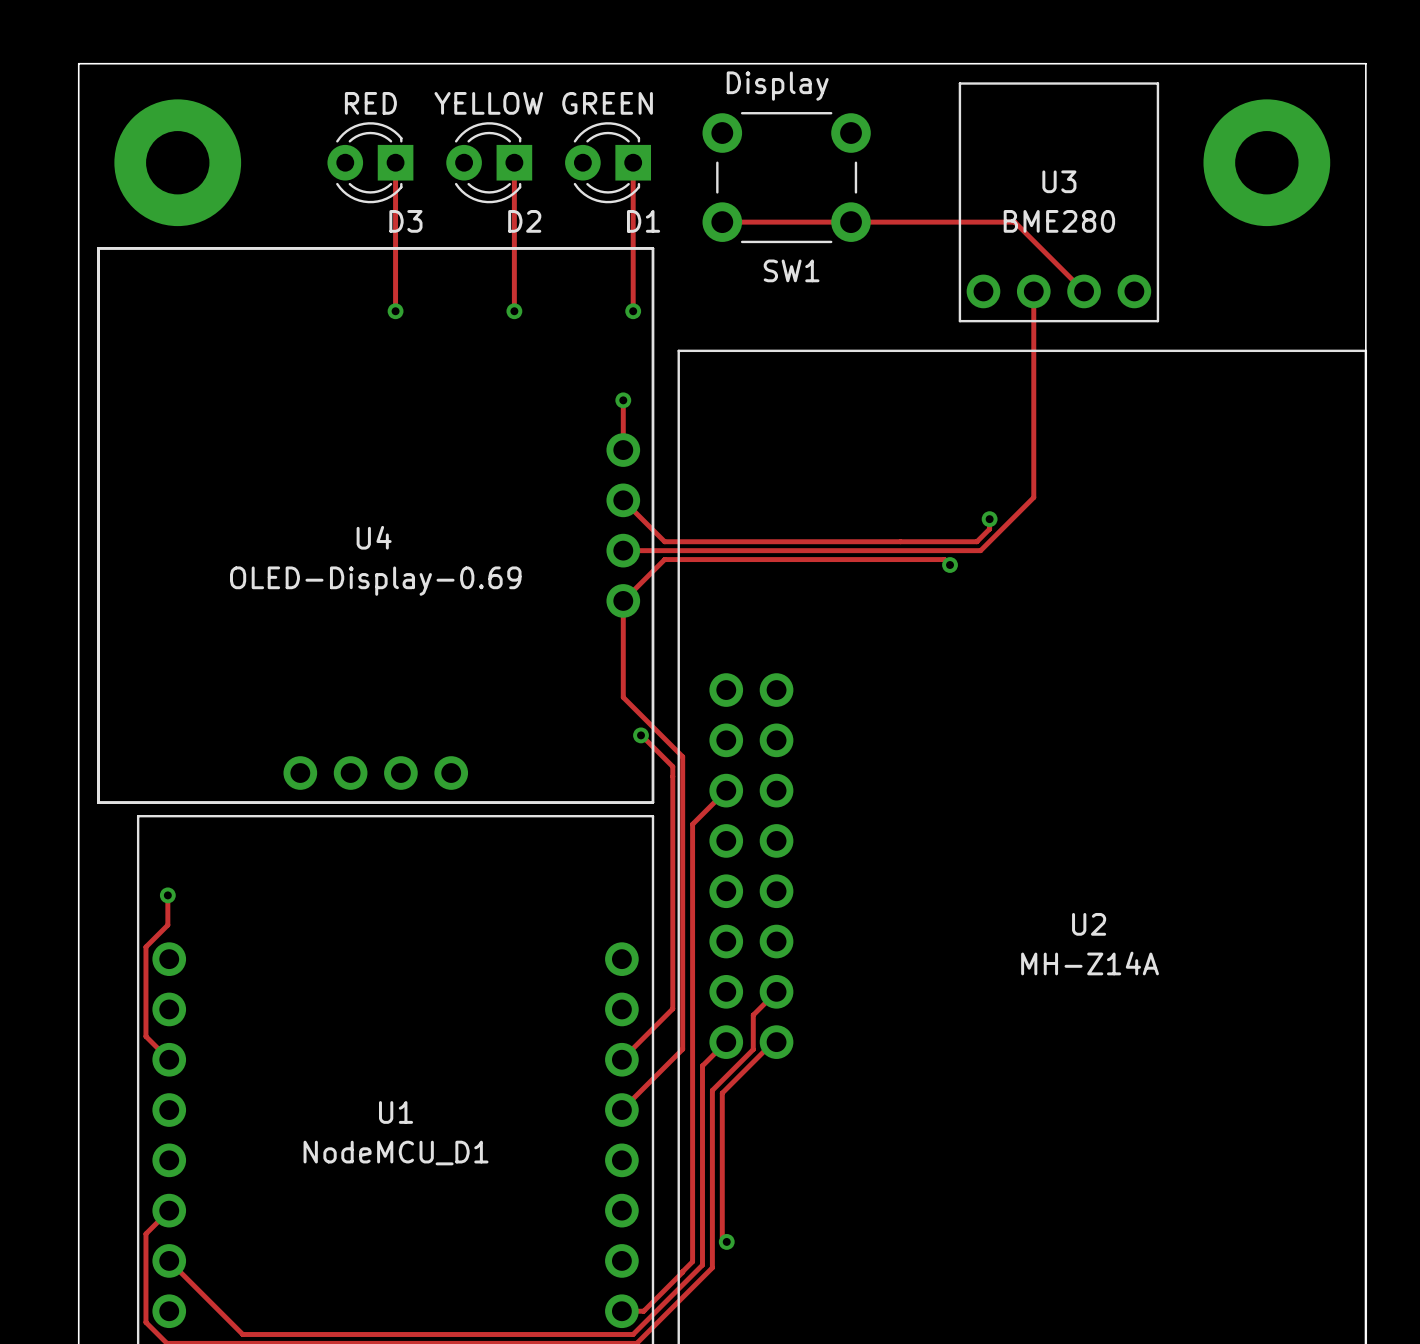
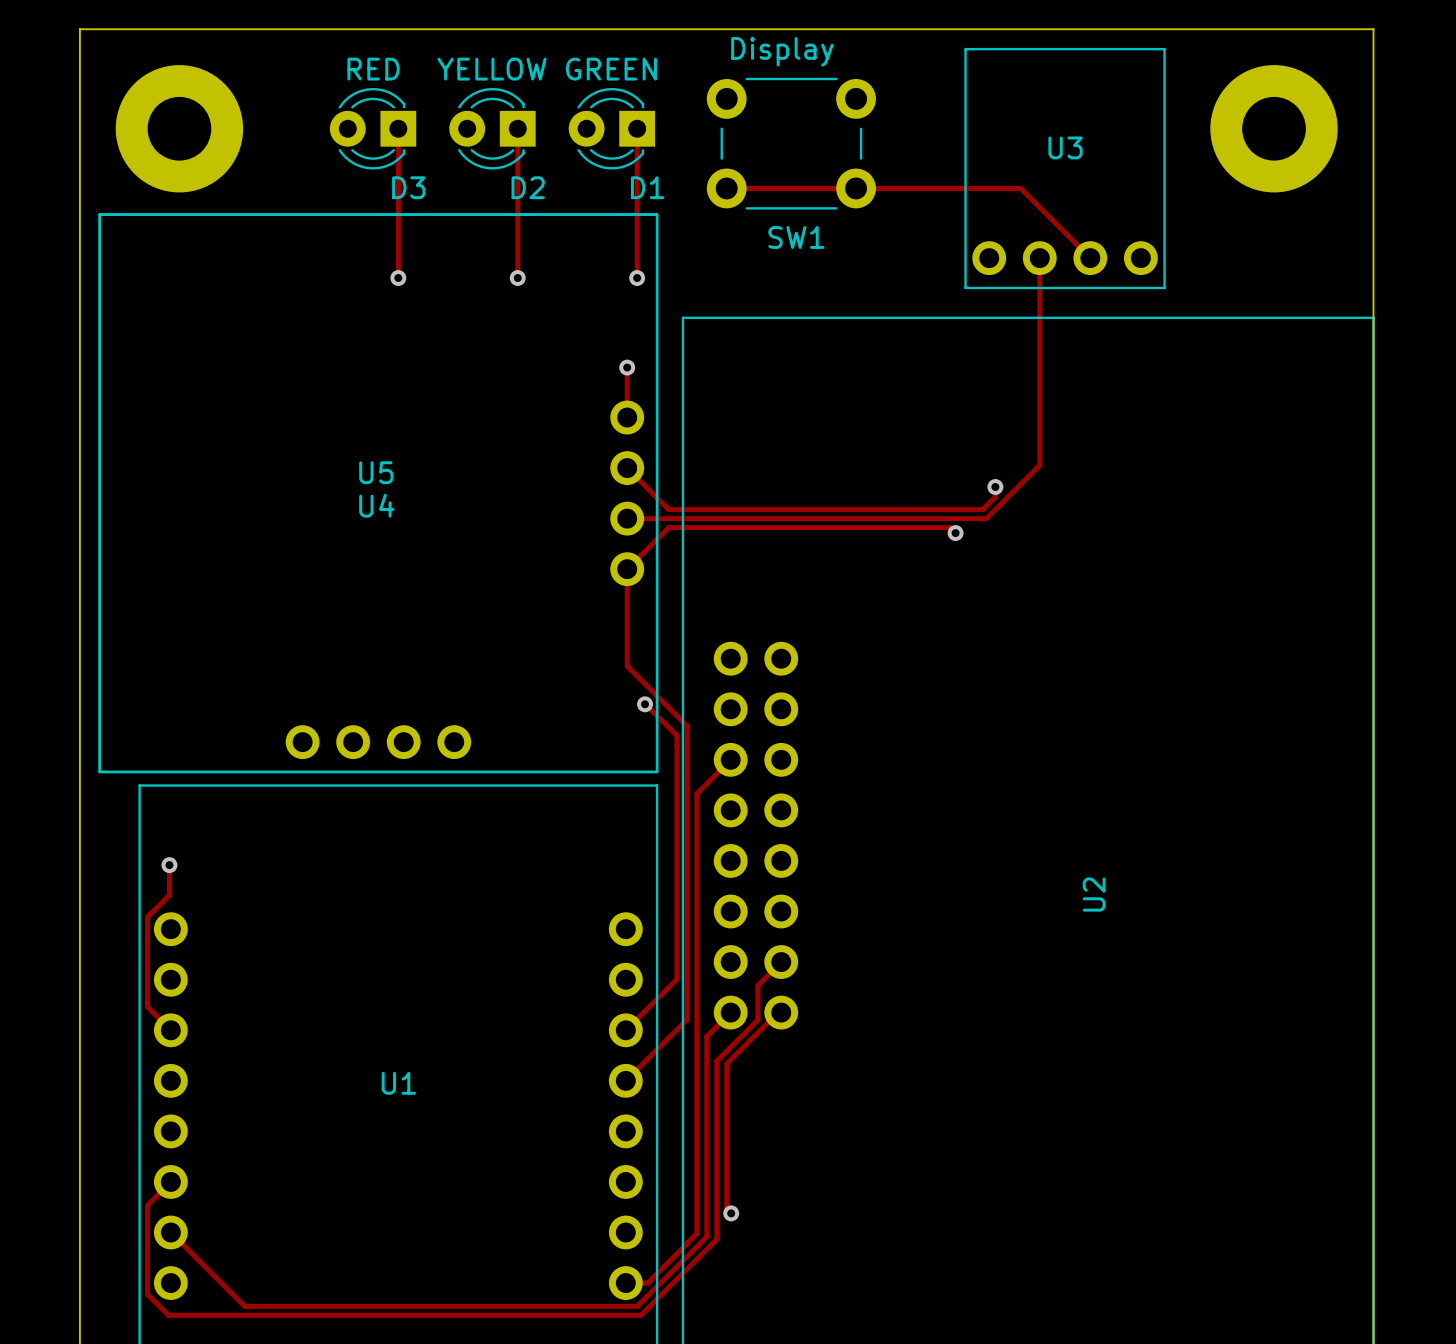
U3 value: BME280 (1059, 221) -> none
U5 name: none -> U5 (376, 472)
U5 value: OLED-Display-0.69 (375, 581) -> none
U2 name rotation: 0° (1089, 924) -> 90° counterclockwise (1094, 894)
U2 value: MH-Z14A (1090, 963) -> none
U1 value: NodeMCU_D1 (396, 1153) -> none

